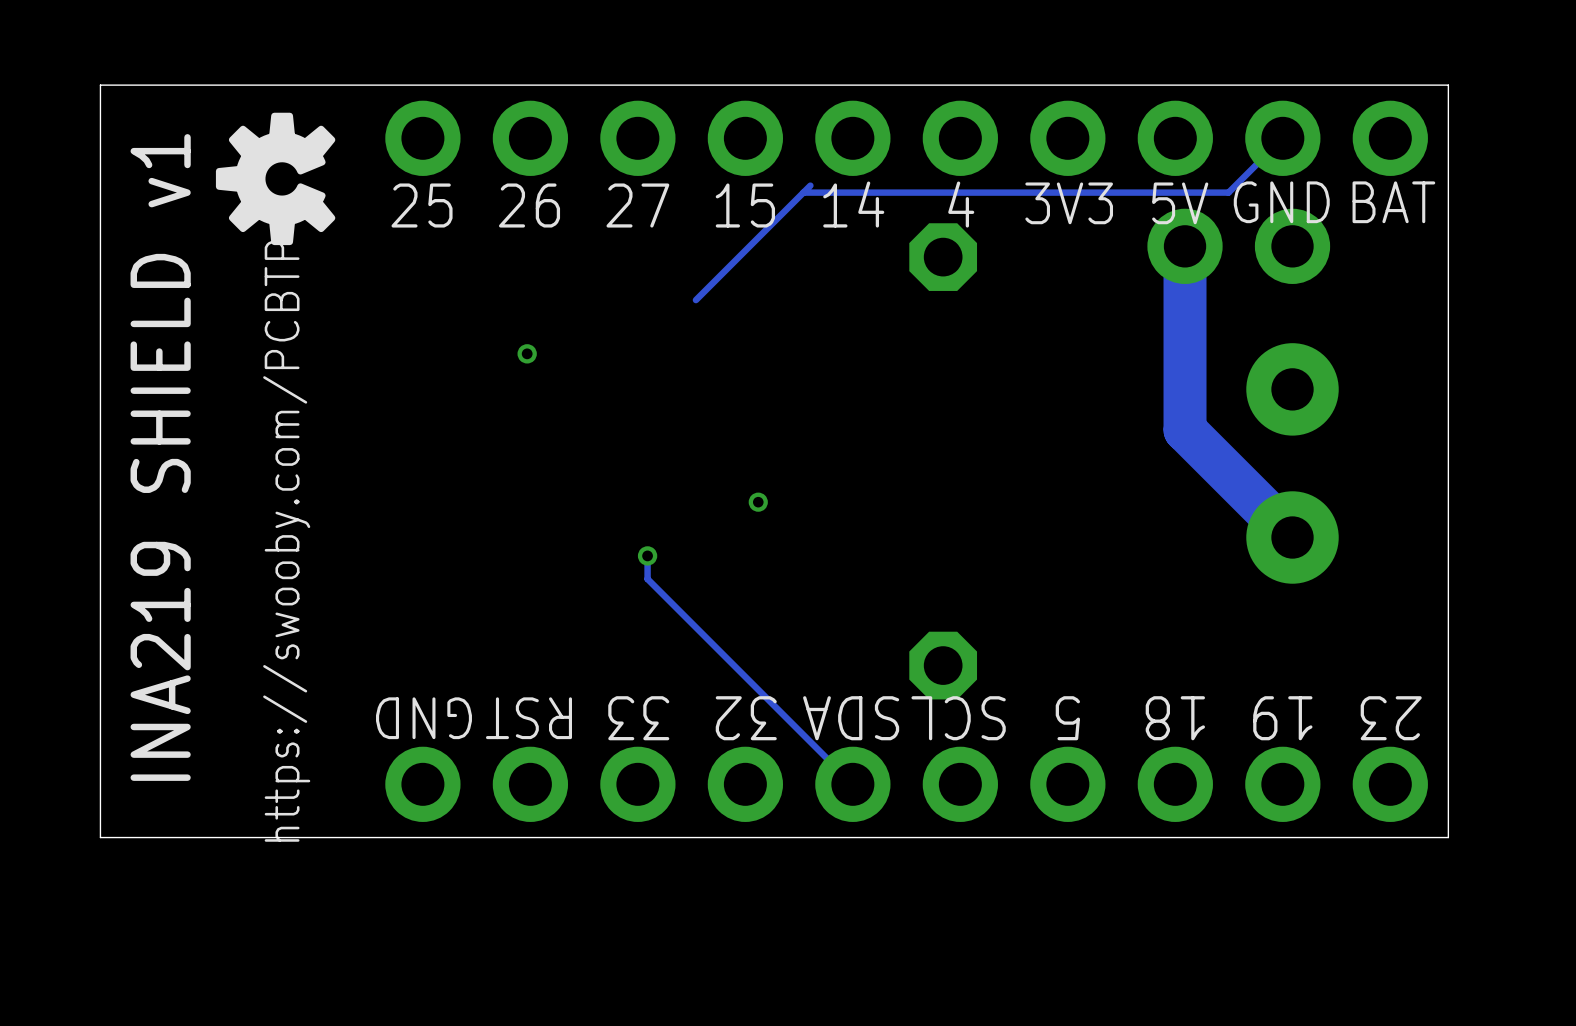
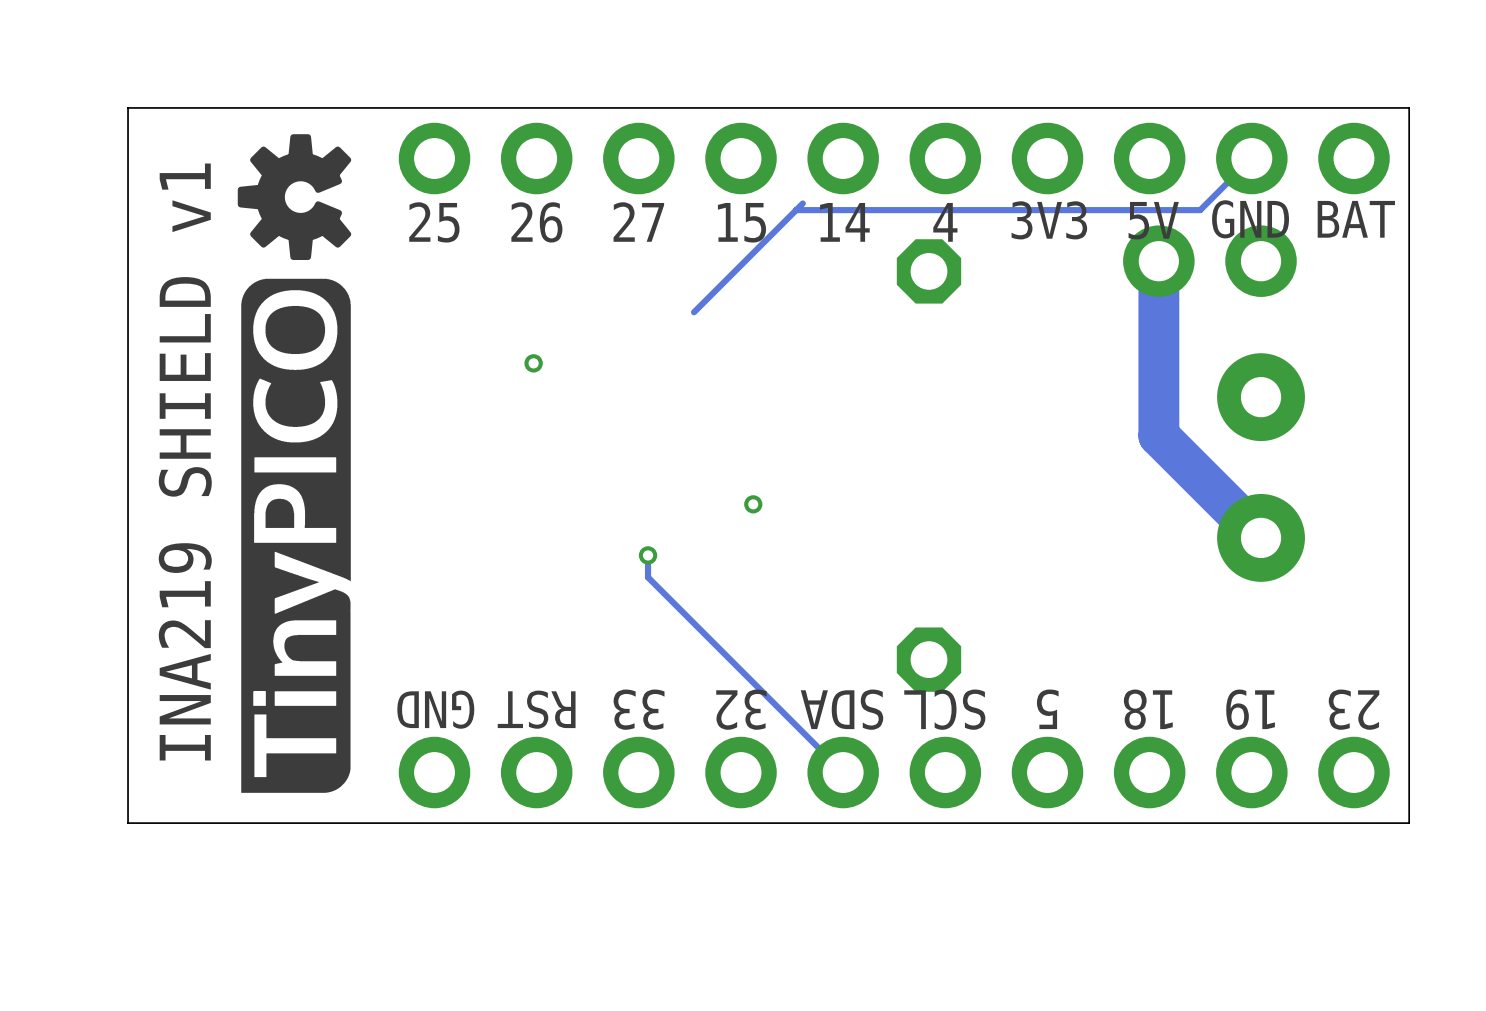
drawing: none -> [241, 278, 351, 793]
text: https://swooby.com/PCBTP (286, 541) -> none

